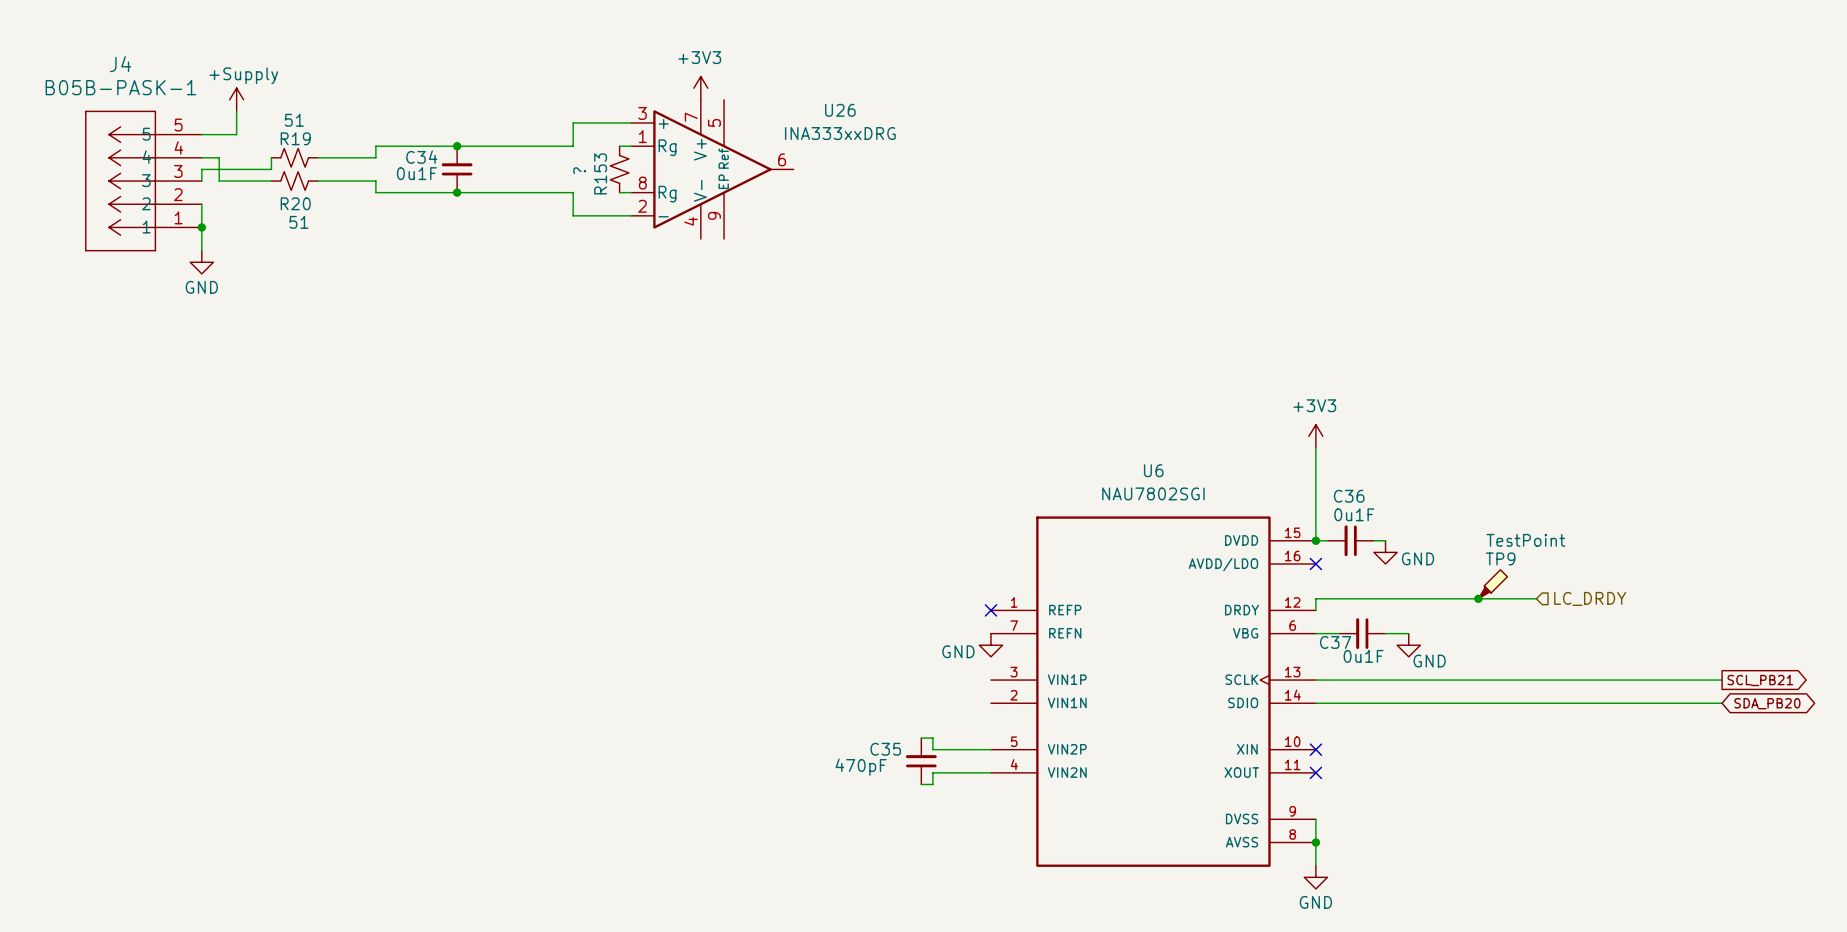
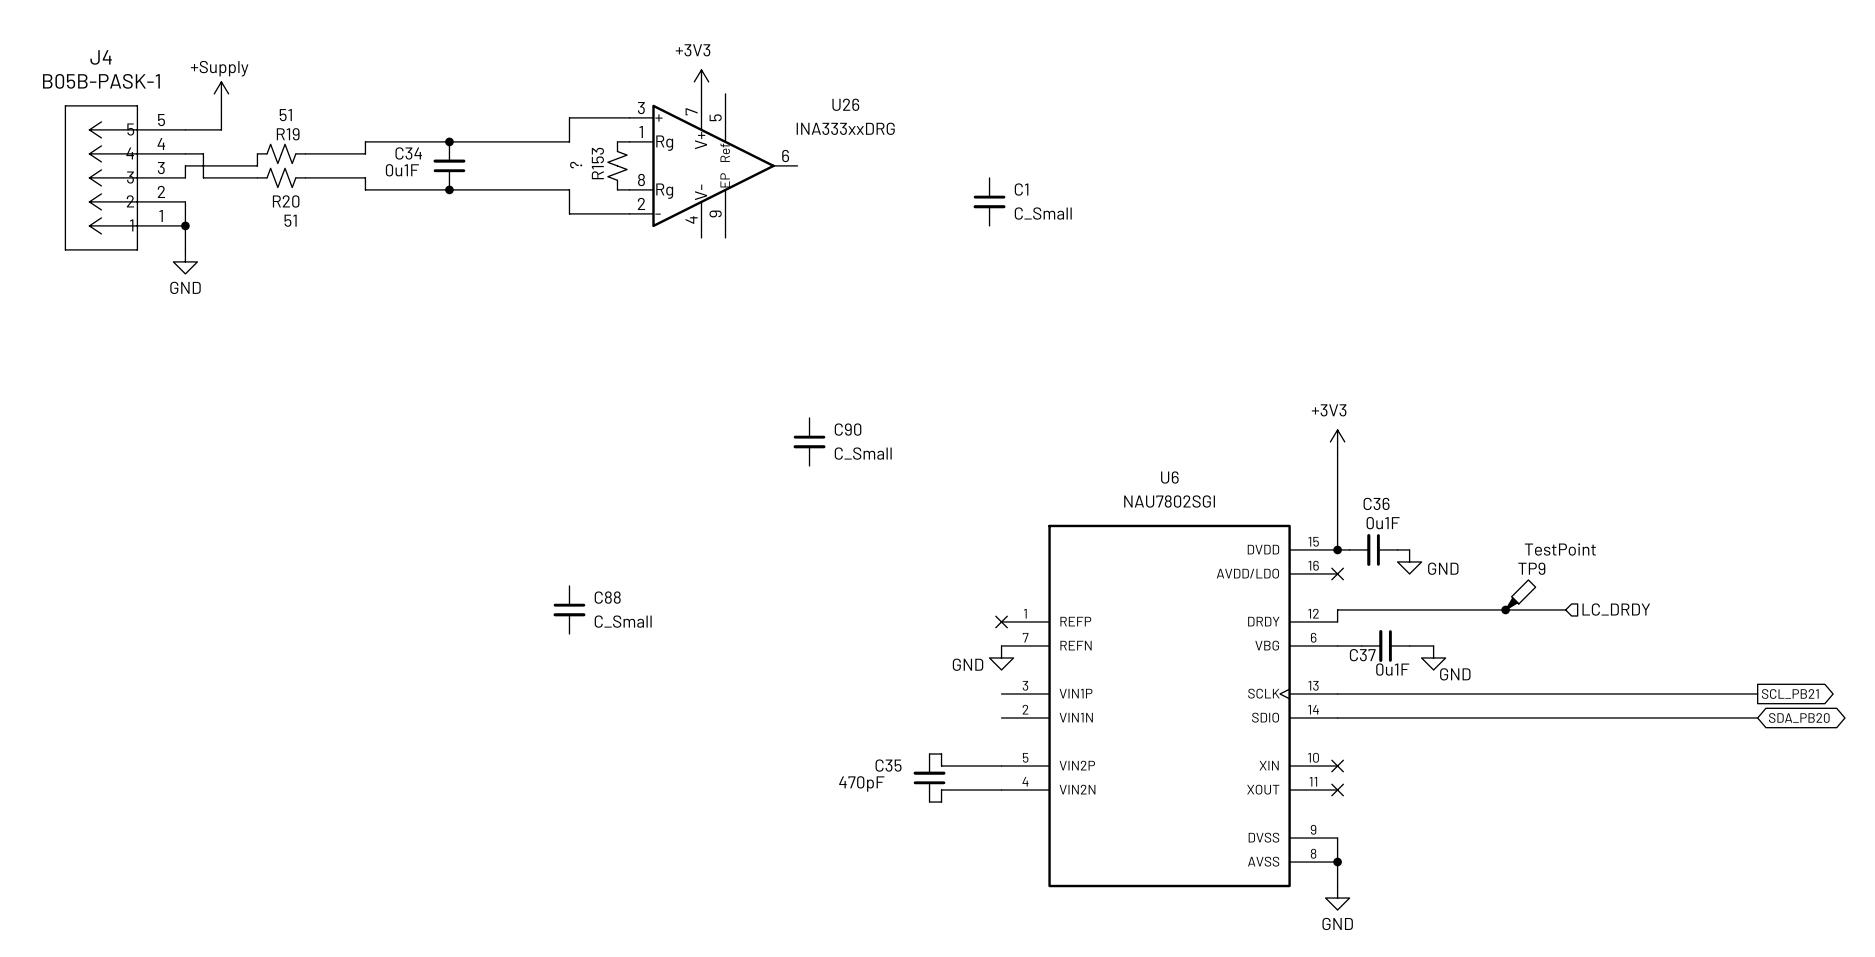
C1: none -> C_Small (989, 201)
C90: none -> C_Small (809, 441)
C88: none -> C_Small (569, 609)

